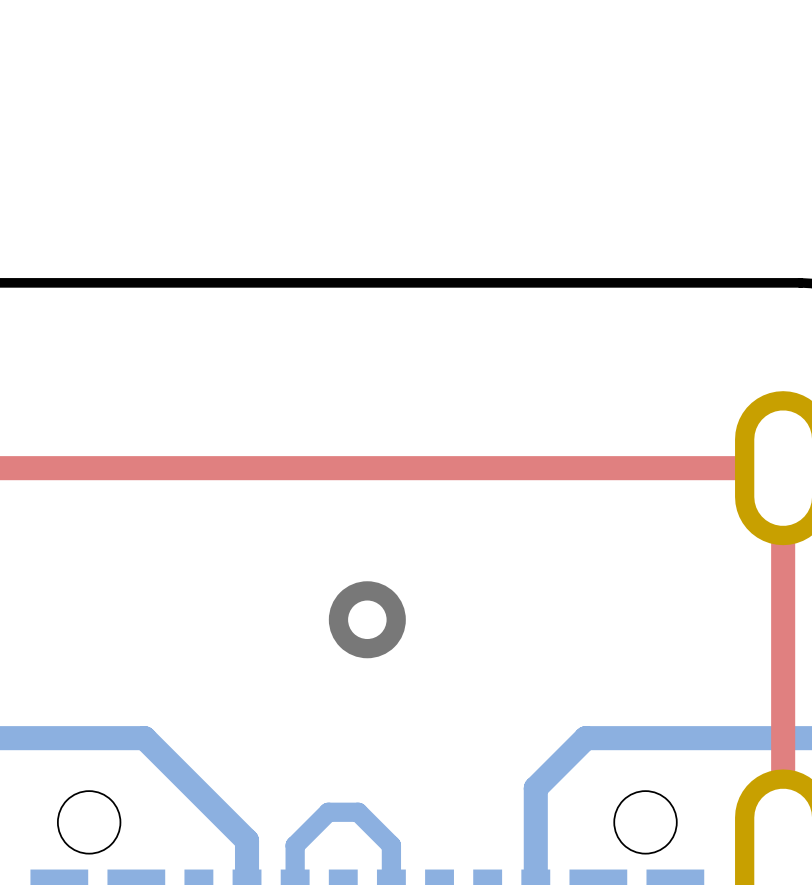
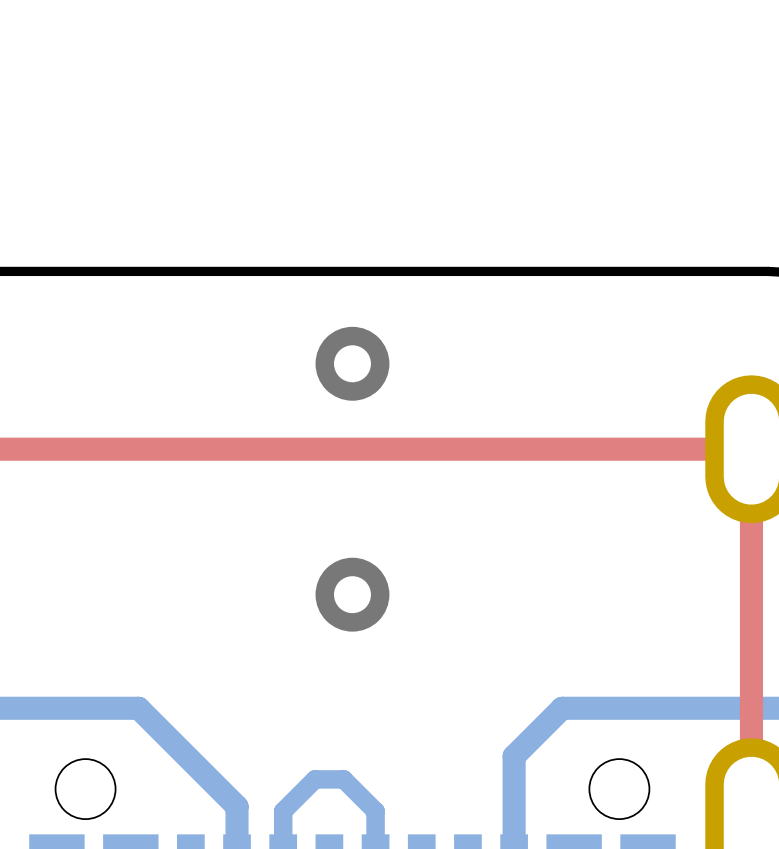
via: none -> (352, 363)

